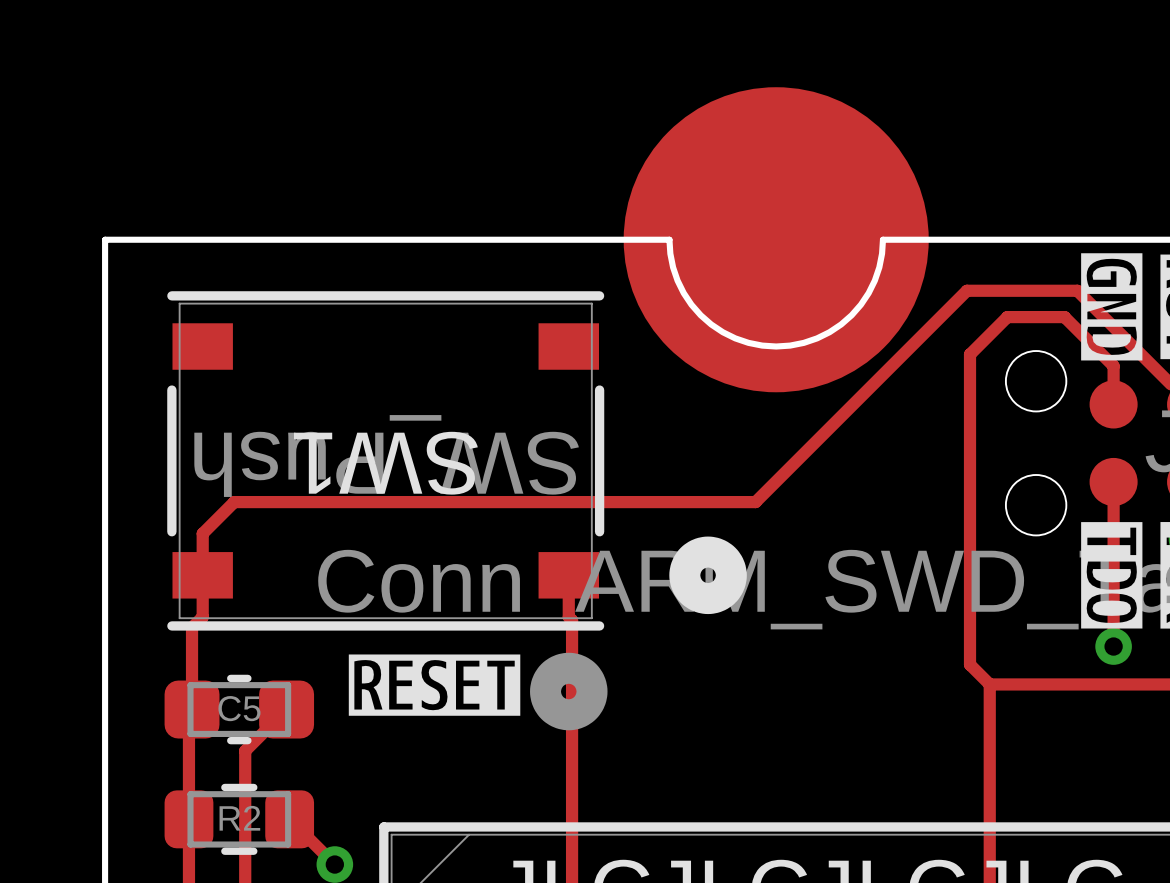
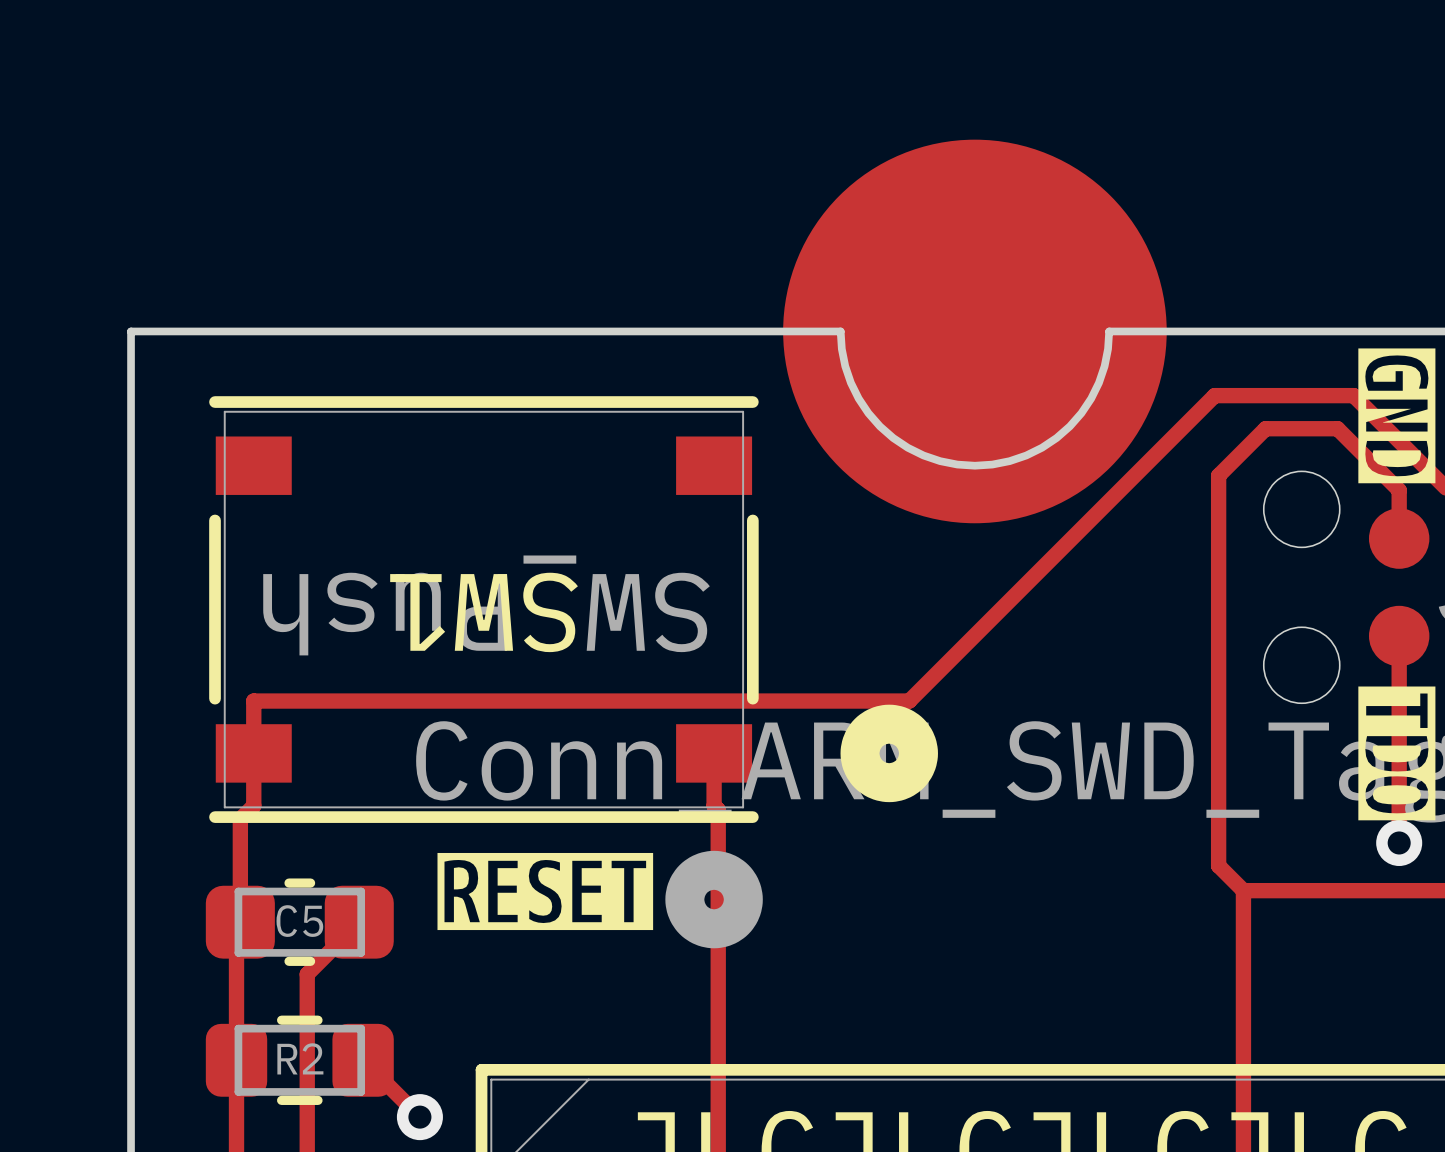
track: (755, 502) (234, 502) (202, 533) -> (949, 661) (909, 701) (253, 701)

